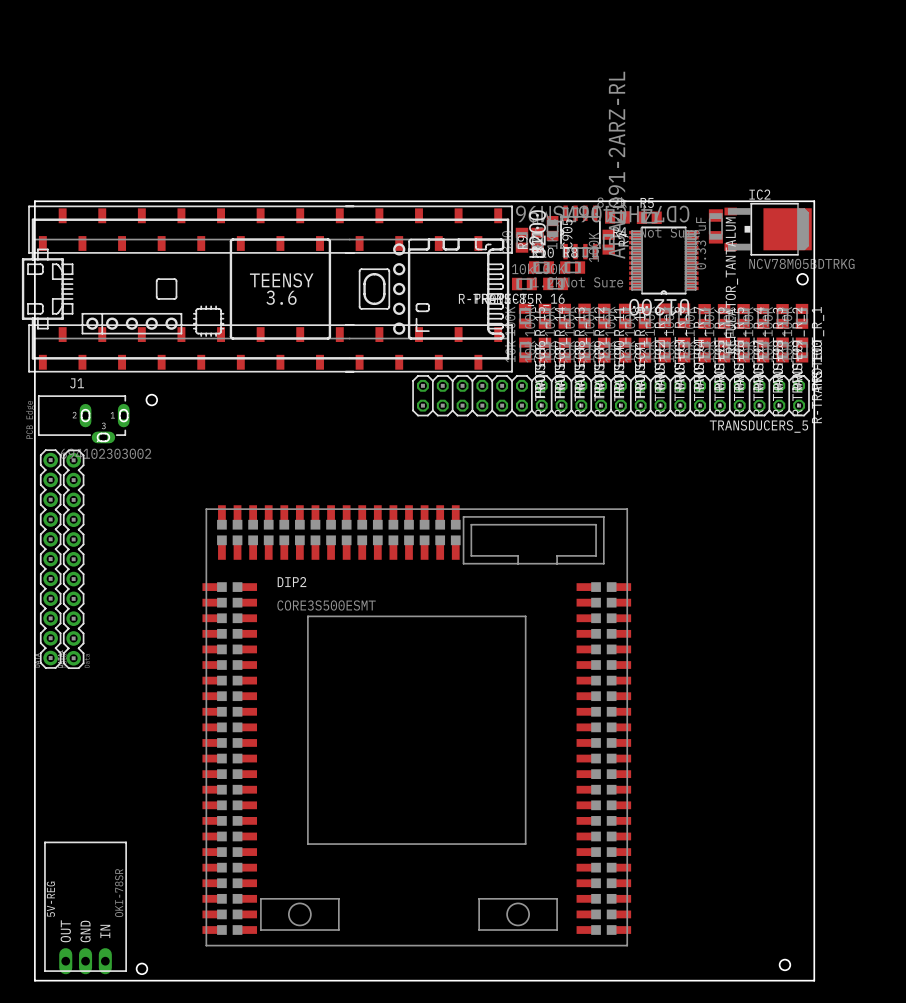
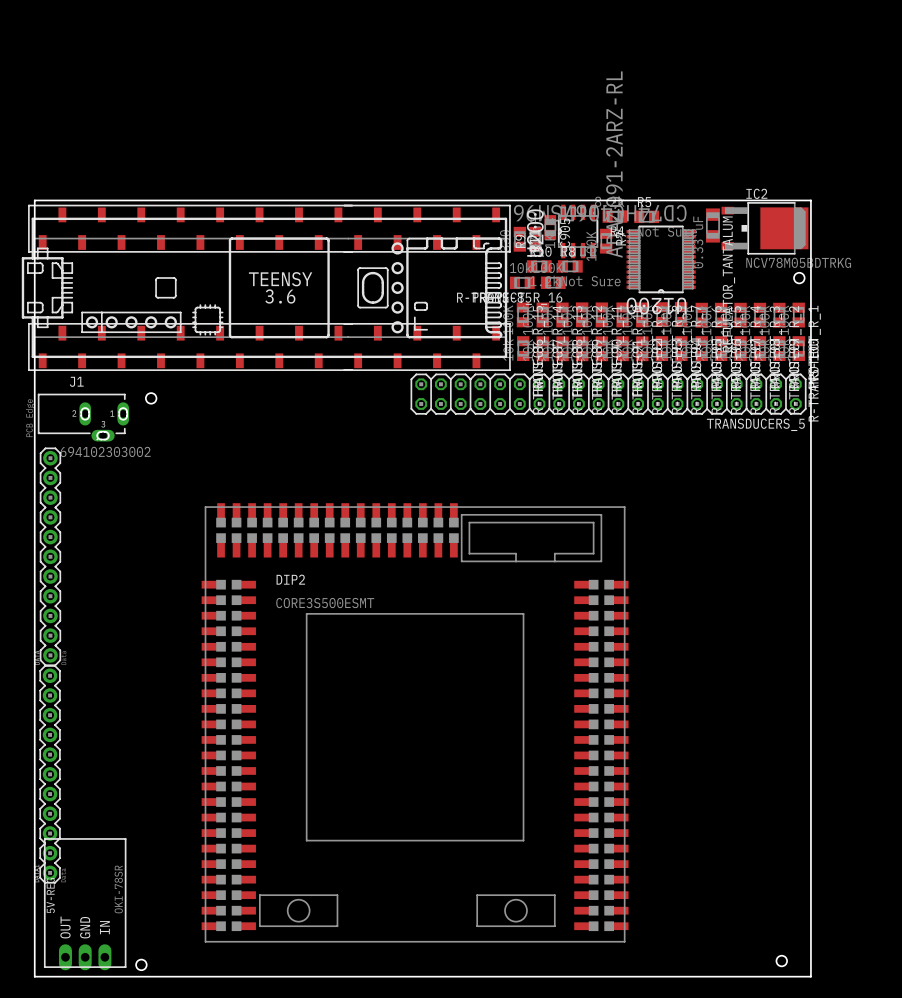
part position: (73, 559) -> (50, 774)

